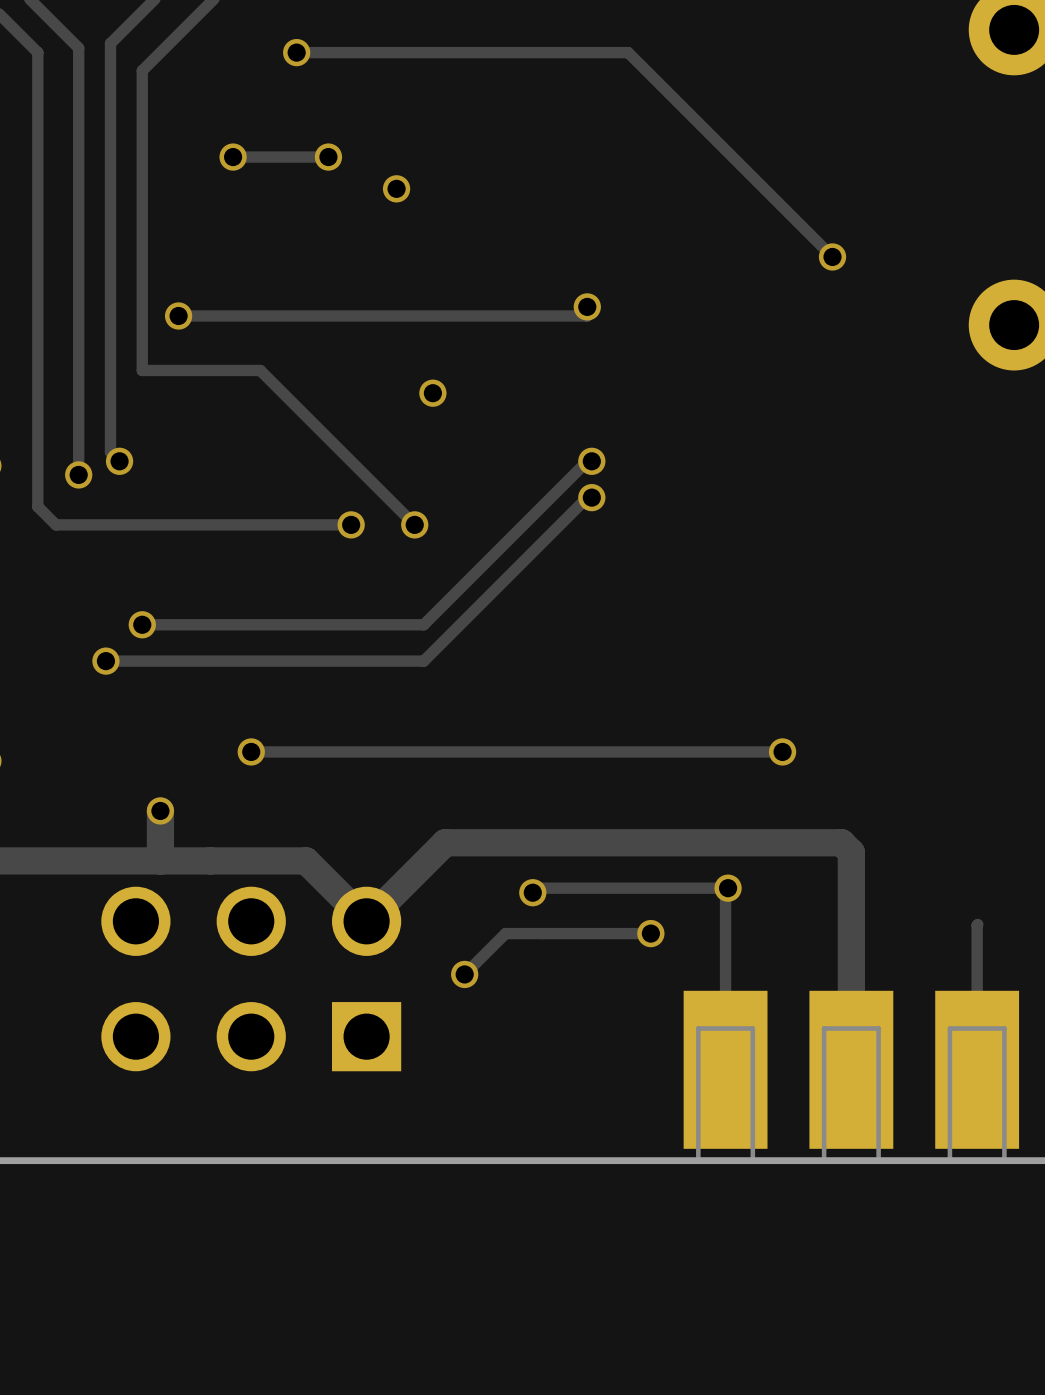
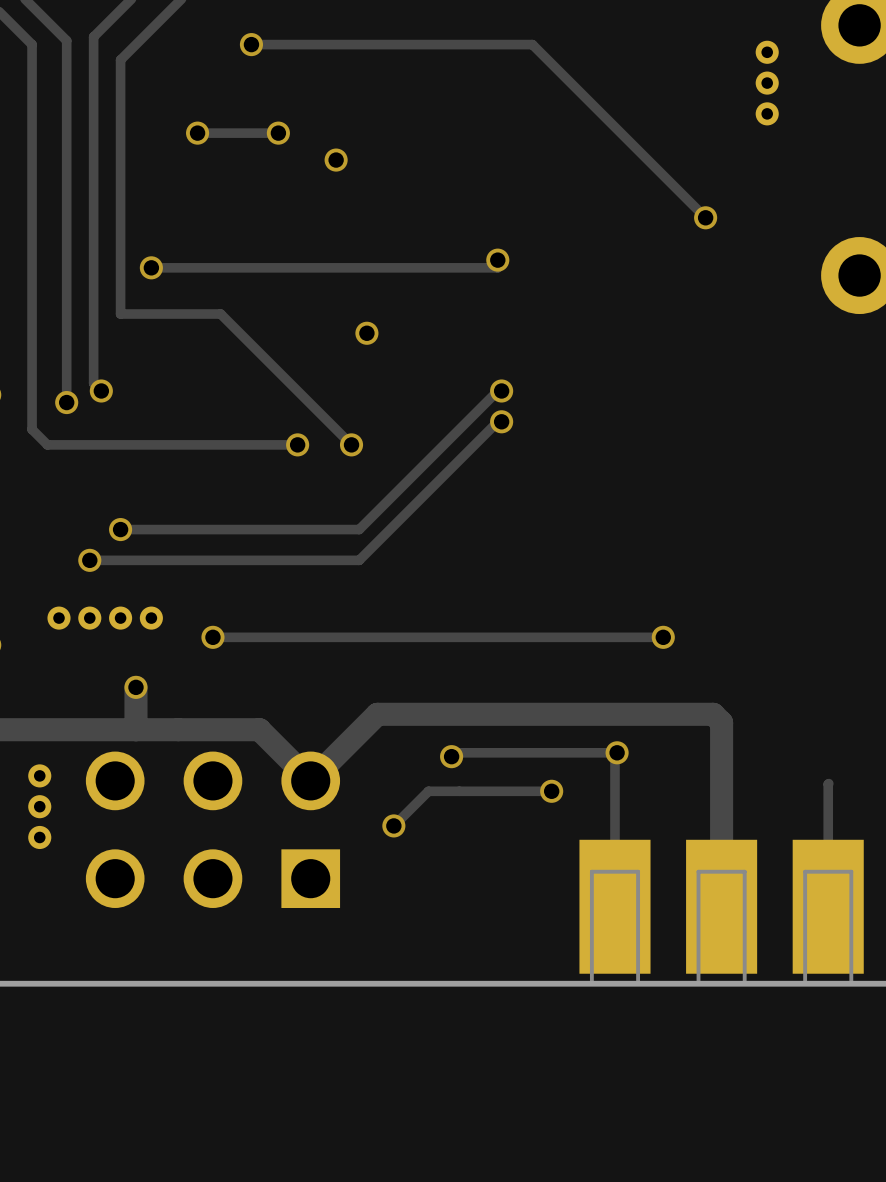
part: none -> (767, 52)
part: none -> (767, 83)
part: none -> (767, 113)
part: none -> (59, 618)
part: none -> (89, 618)
part: none -> (120, 618)
part: none -> (151, 618)
part: none -> (39, 775)
part: none -> (39, 806)
part: none -> (39, 837)

